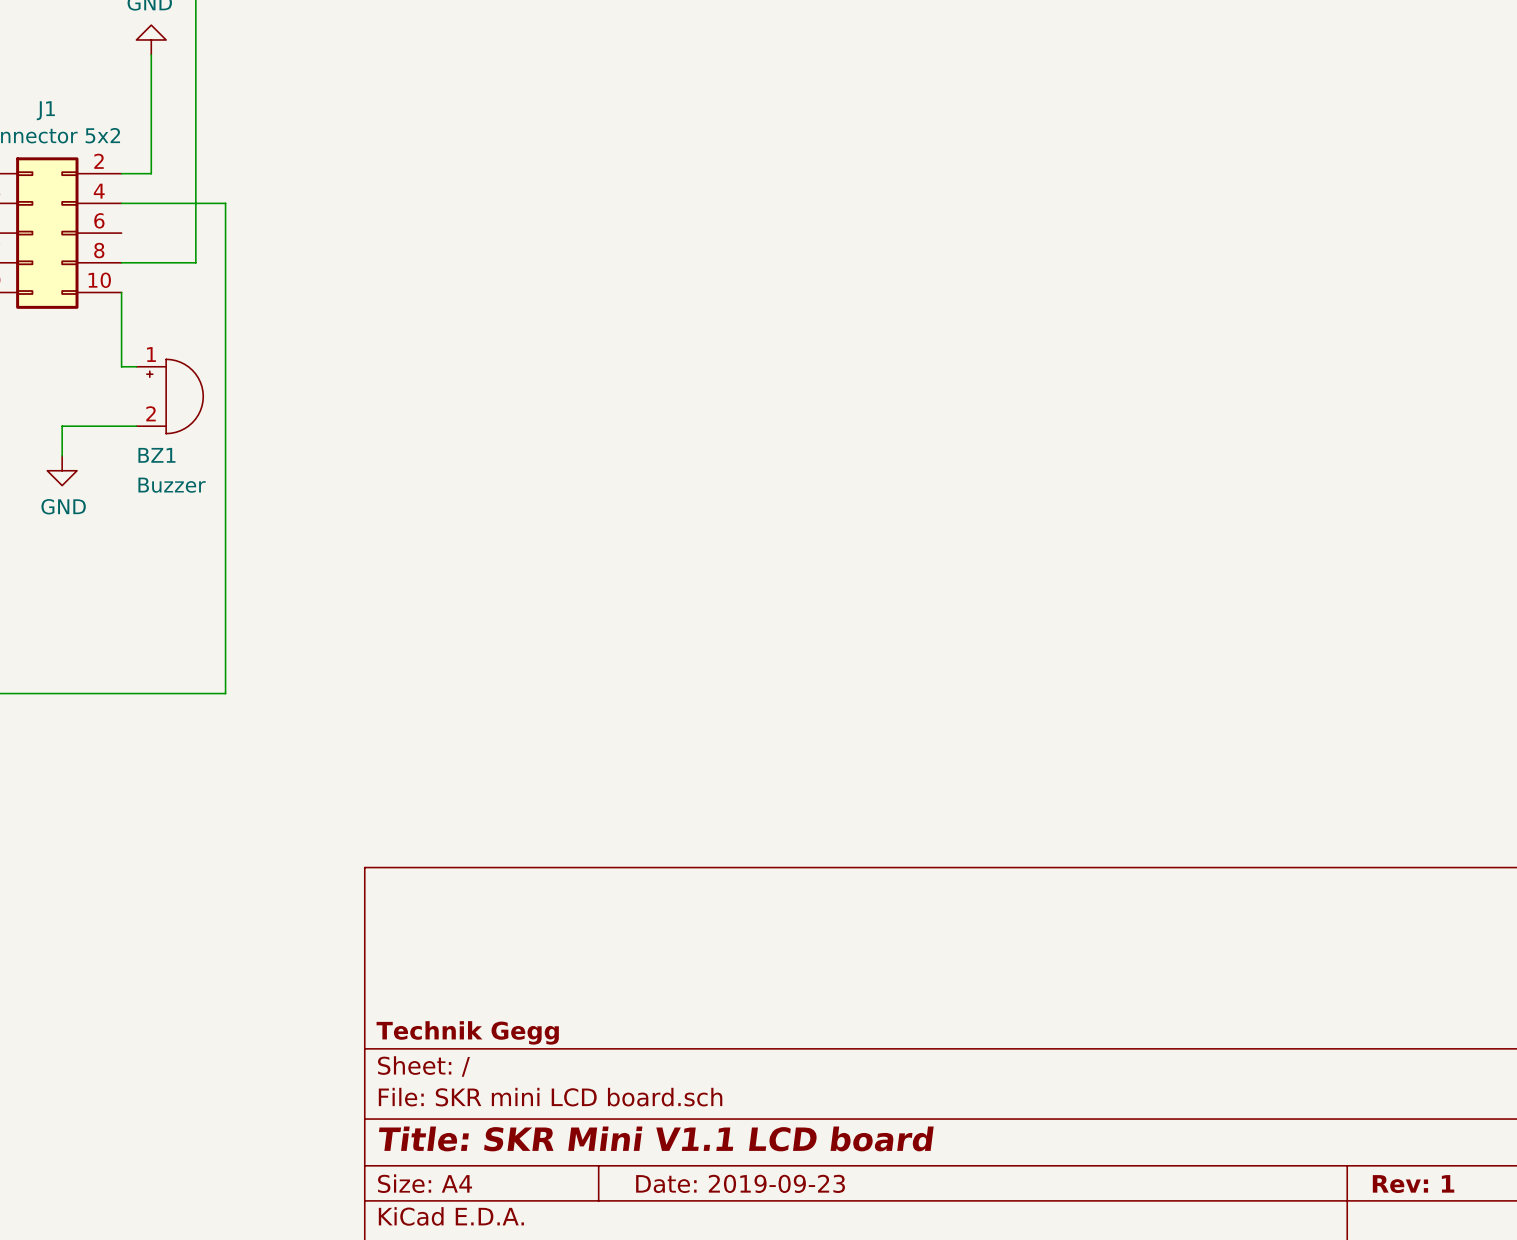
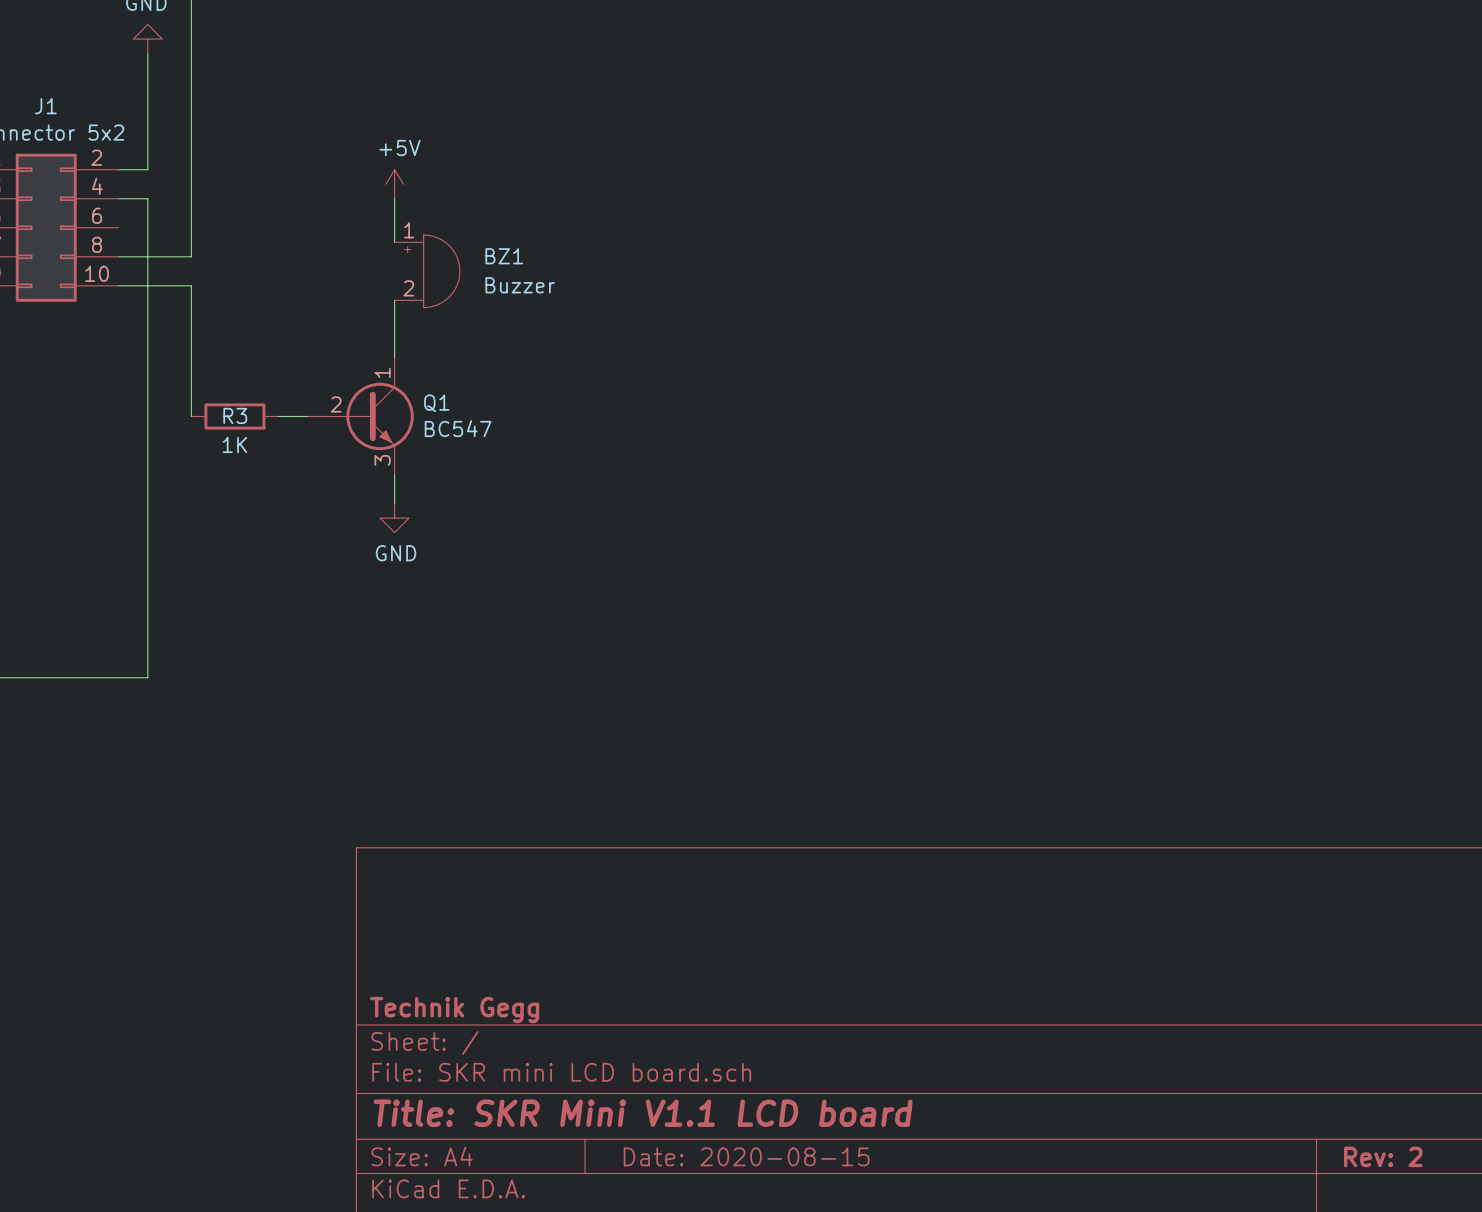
power symbol: none -> +5V (394, 184)
wire: (151, 203) (225, 203) (225, 693) (151, 693) -> (147, 198) (147, 677)
wire: none -> (394, 198) (394, 242)
wire: (121, 292) (121, 366) (136, 366) -> (118, 285) (191, 285) (191, 416)
wire: none -> (394, 300) (394, 358)
BZ1 position: (169, 396) -> (427, 271)
wire: (136, 426) (62, 426) (62, 455) -> none
R3: none -> 1K (234, 416)
wire: none -> (278, 416) (307, 416)
Q1: none -> BC547 (360, 416)
BZ1 name position: BZ1 (156, 455) -> BZ1 (504, 256)
power symbol: GND (62, 470) -> none
BZ1 value position: Buzzer (172, 485) -> Buzzer (520, 285)
wire: none -> (394, 474) (394, 503)
power symbol: none -> GND (394, 518)
title block: Date: 2019-09-23 (740, 1183) -> Date: 2020-08-15 (746, 1156)
title block: Rev: 1 (1413, 1184) -> Rev: 2 (1383, 1156)

